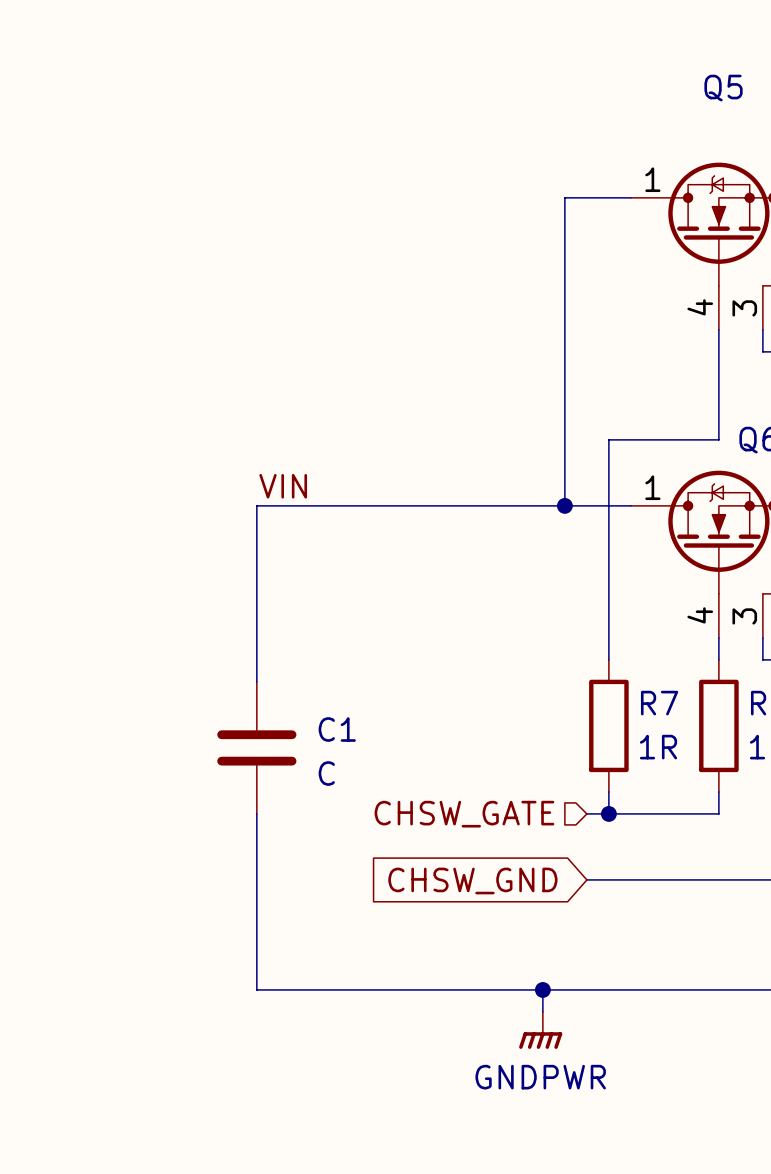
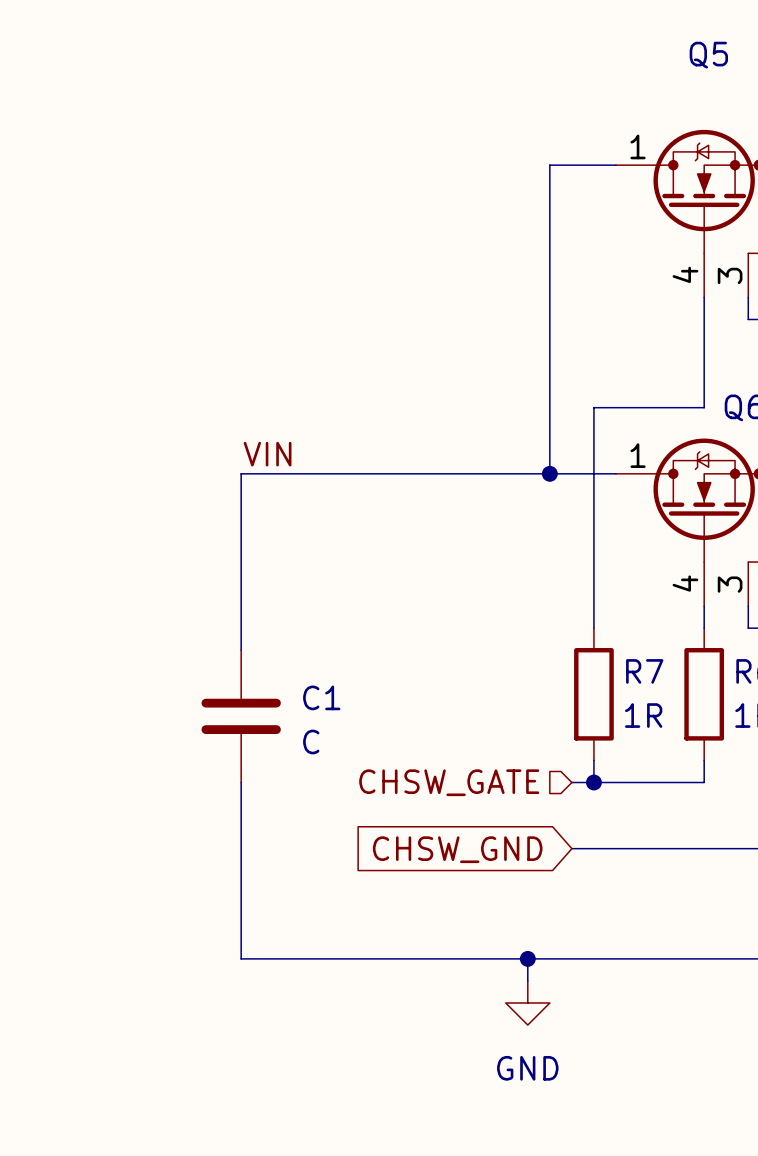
power symbol: GNDPWR (540, 1030) -> GND (527, 1002)

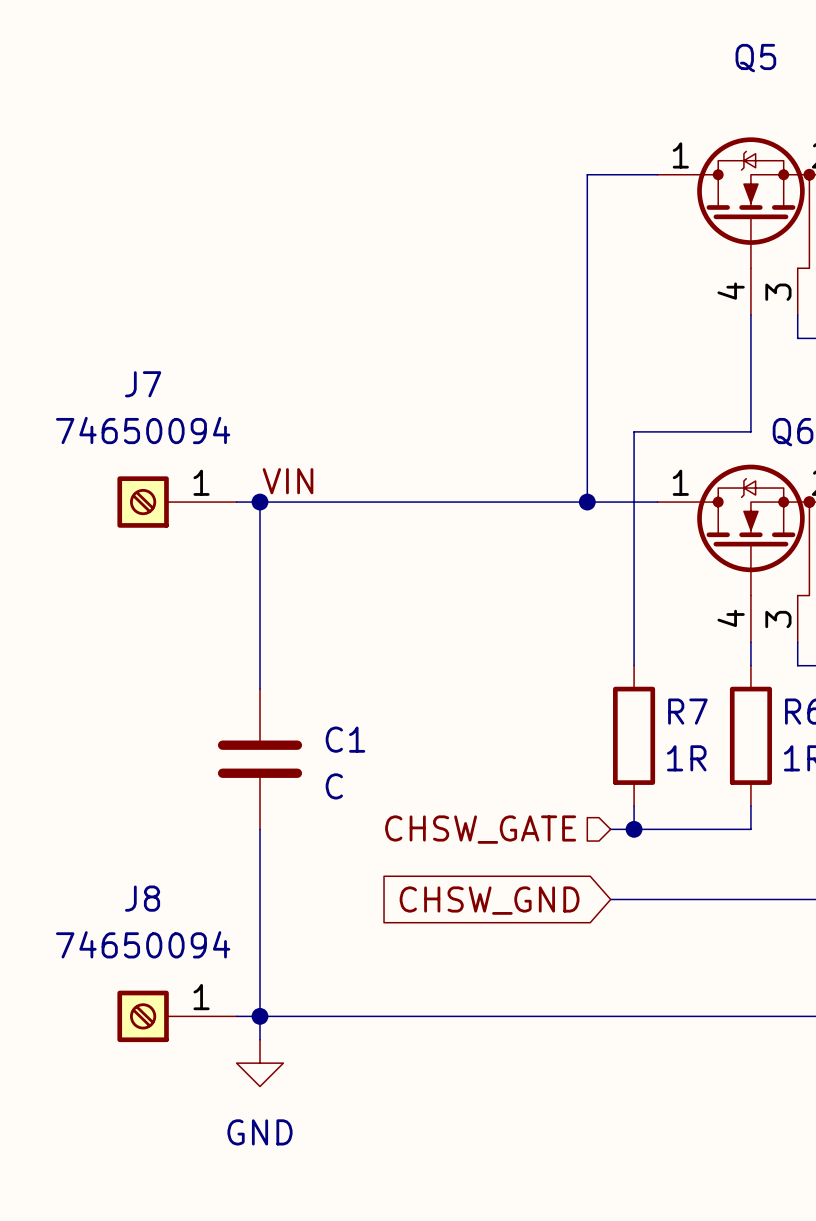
J7: none -> 74650094 (177, 502)
wire: none -> (236, 502) (260, 502)
junction: none -> (260, 502)
J8: none -> 74650094 (177, 1016)
wire: none -> (236, 1016) (260, 1016) (260, 1039)
junction: none -> (260, 1016)
wire: (527, 958) (527, 980) -> none
junction: (527, 958) -> none
power symbol position: GND (527, 1002) -> GND (260, 1063)

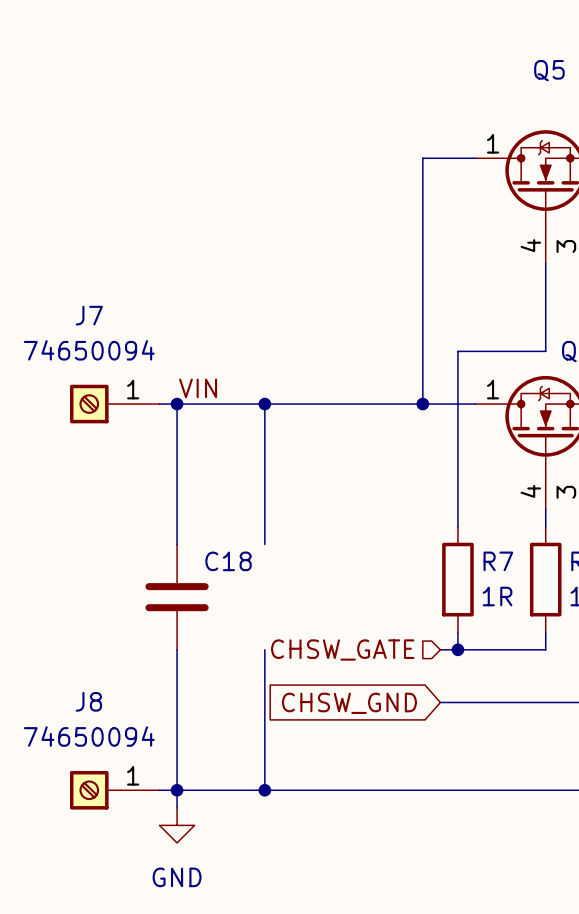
wire: none -> (264, 404) (264, 544)
junction: none -> (264, 404)
C1 name: C1 (345, 739) -> C18 (228, 561)
C1 value: C (334, 786) -> none
wire: none -> (264, 649) (264, 790)
junction: none -> (264, 790)

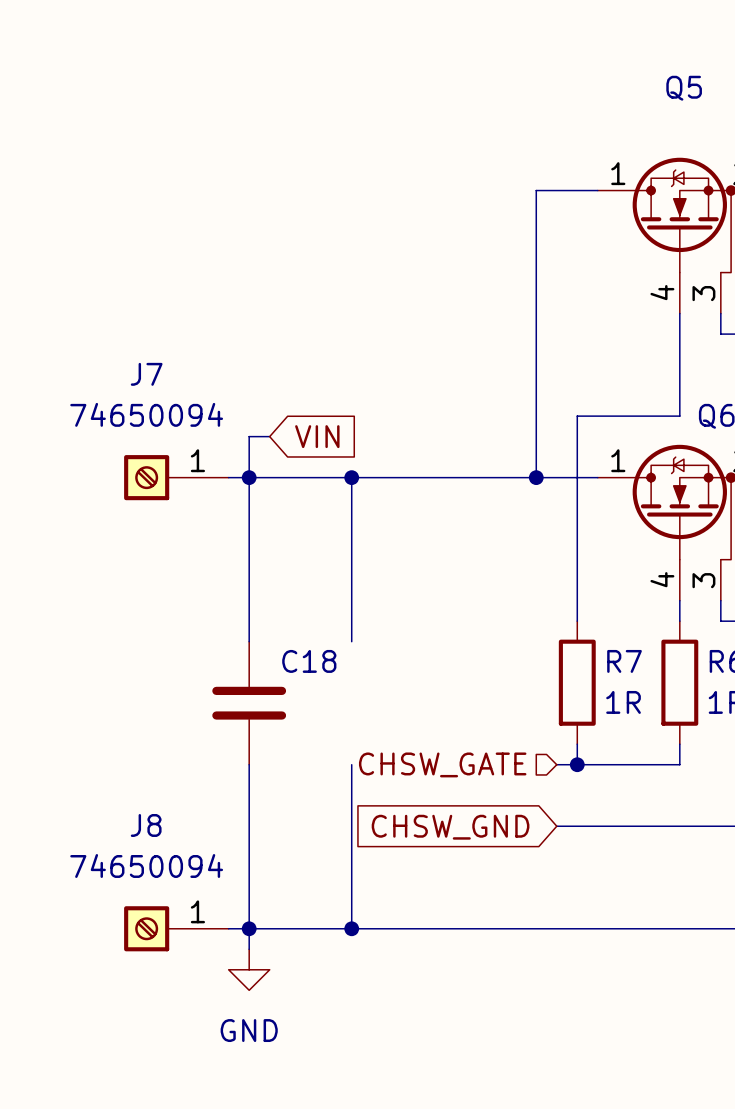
wire: none -> (269, 436) (249, 436) (249, 477)
global label: none -> VIN (317, 436)
label: VIN (198, 388) -> none

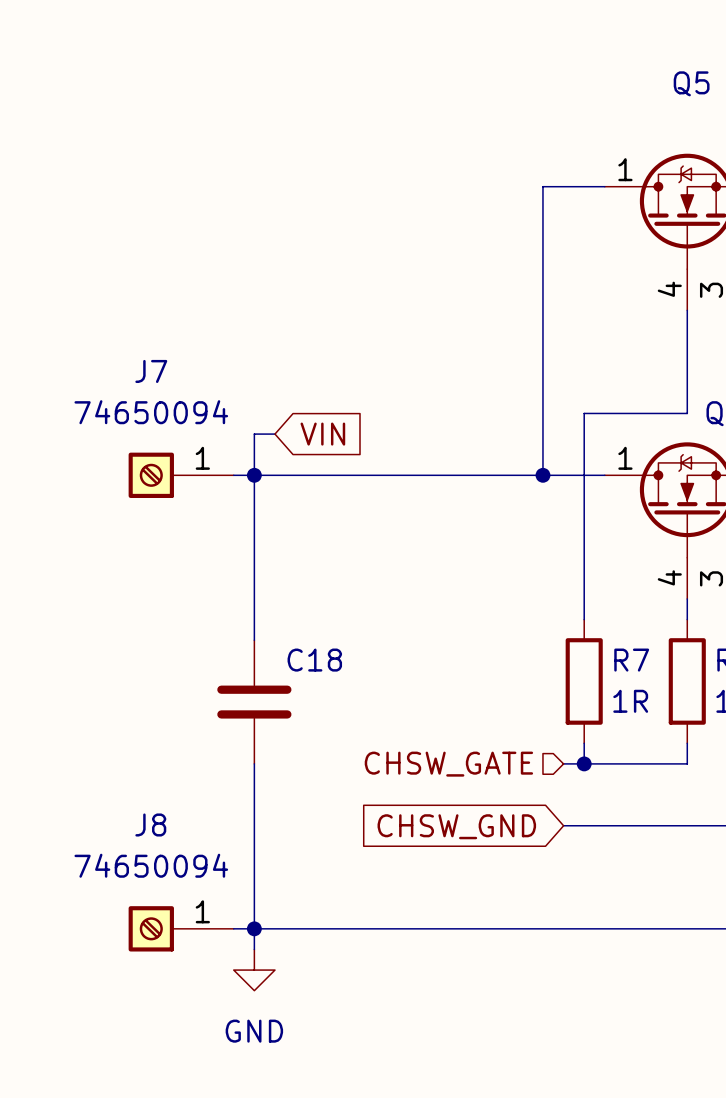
wire: (351, 477) (351, 641) -> none
junction: (351, 477) -> none
wire: (351, 764) (351, 928) -> none
junction: (351, 928) -> none

